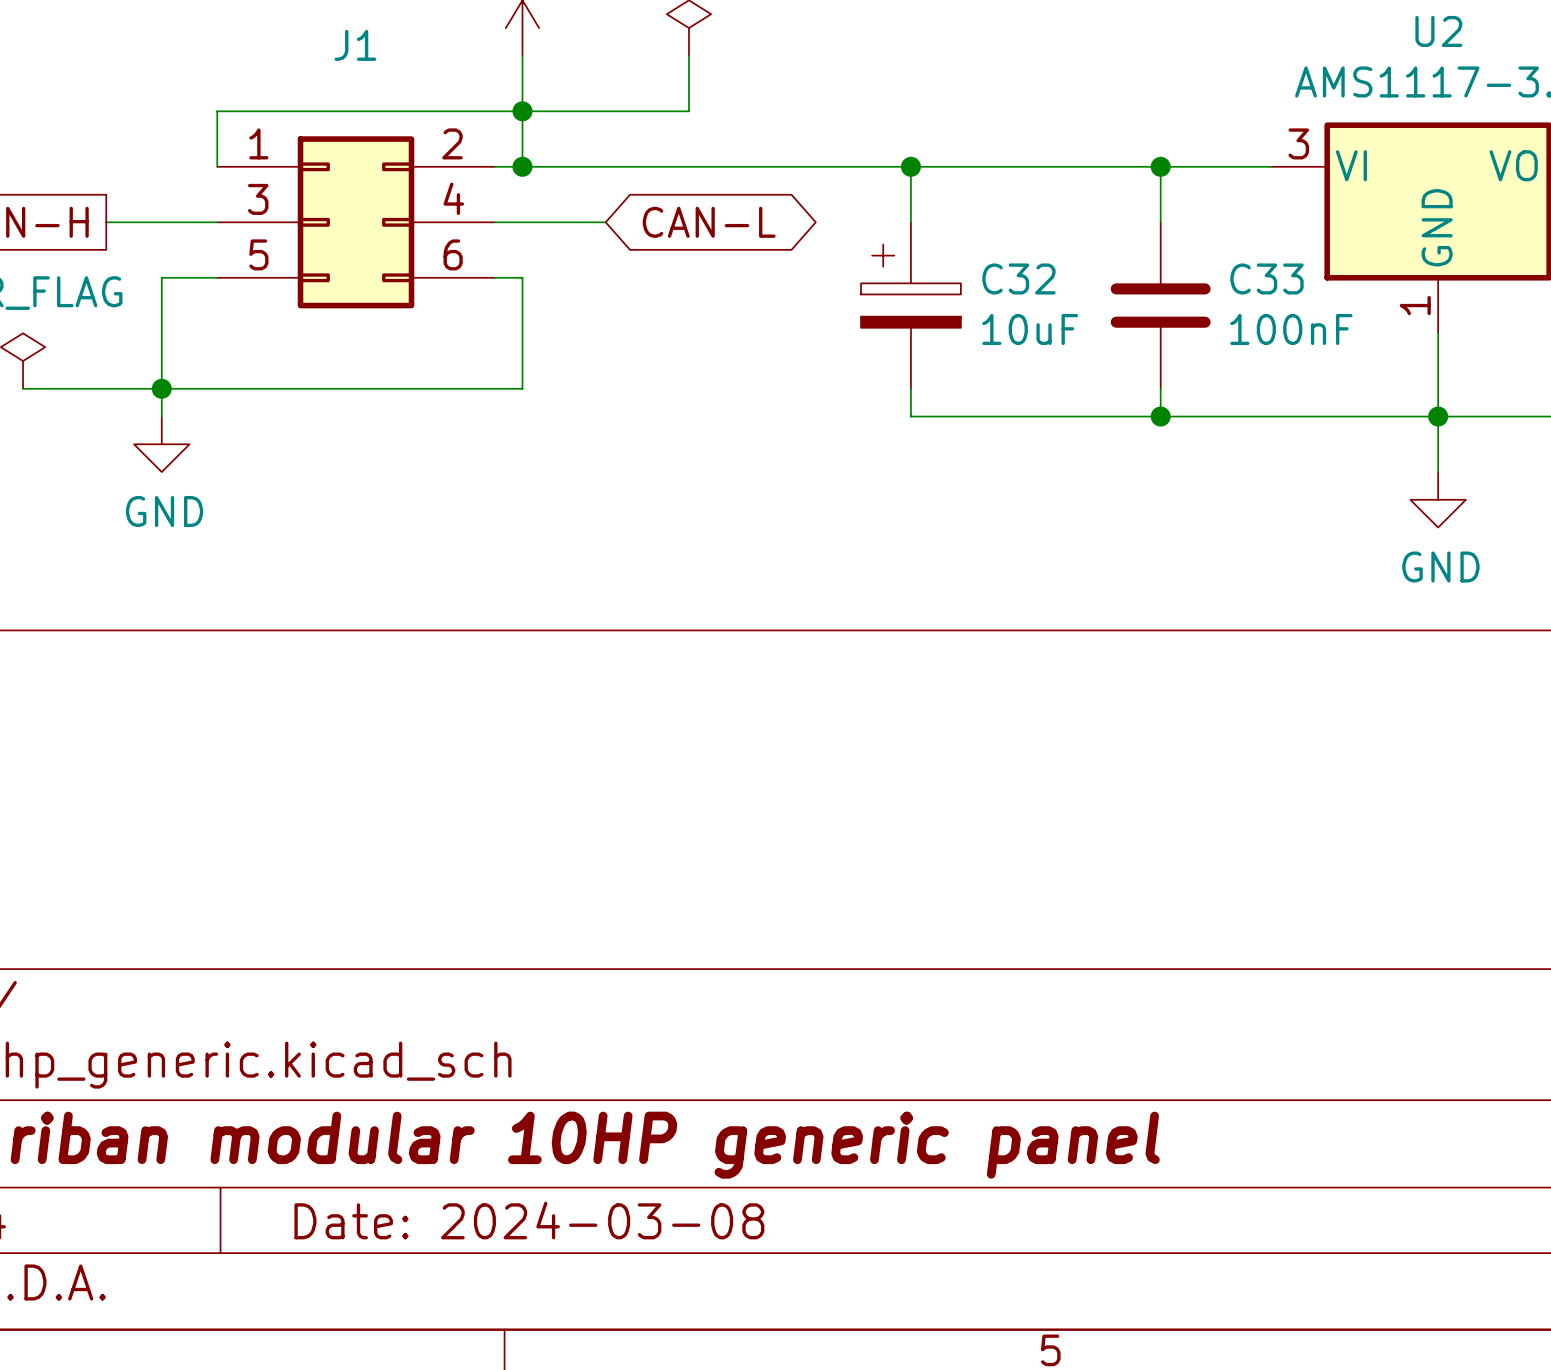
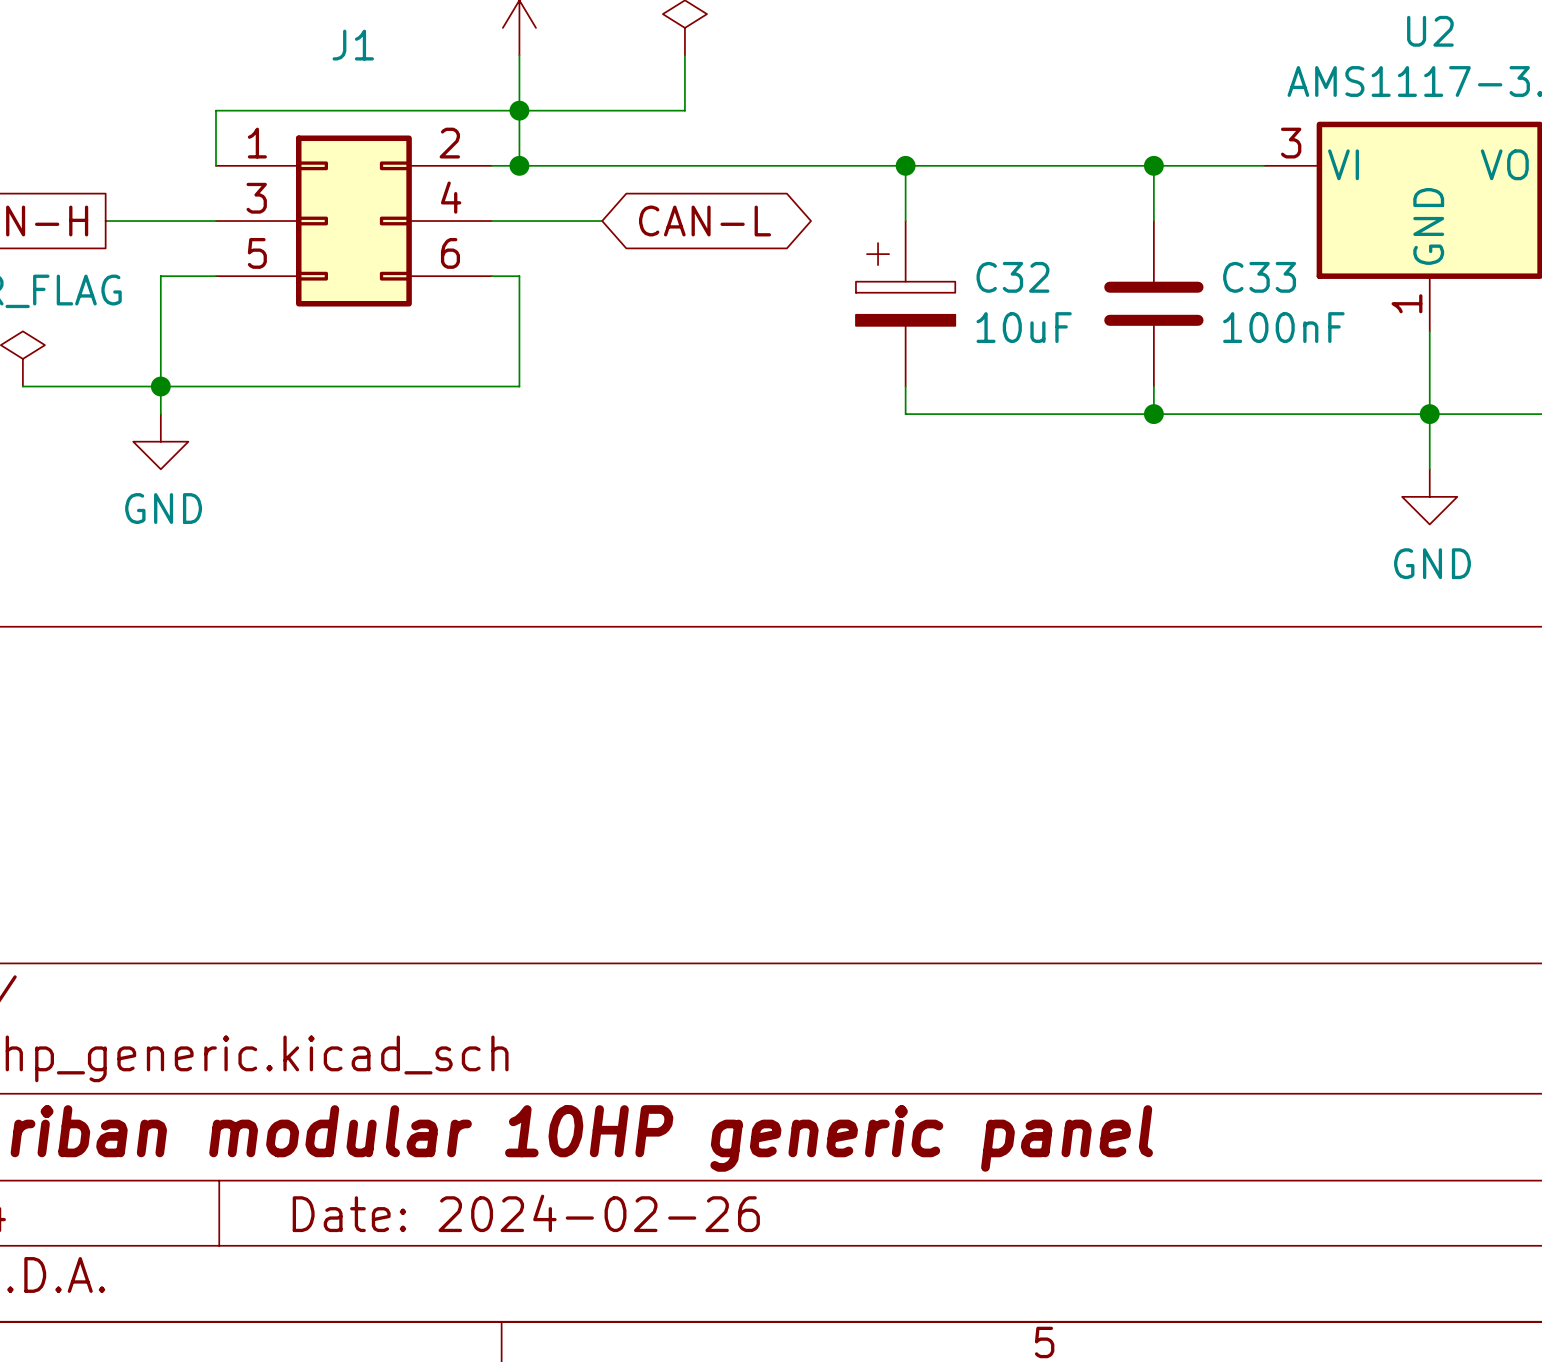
title block: Date: 2024-03-08 (529, 1220) -> Date: 2024-02-26 (526, 1213)

